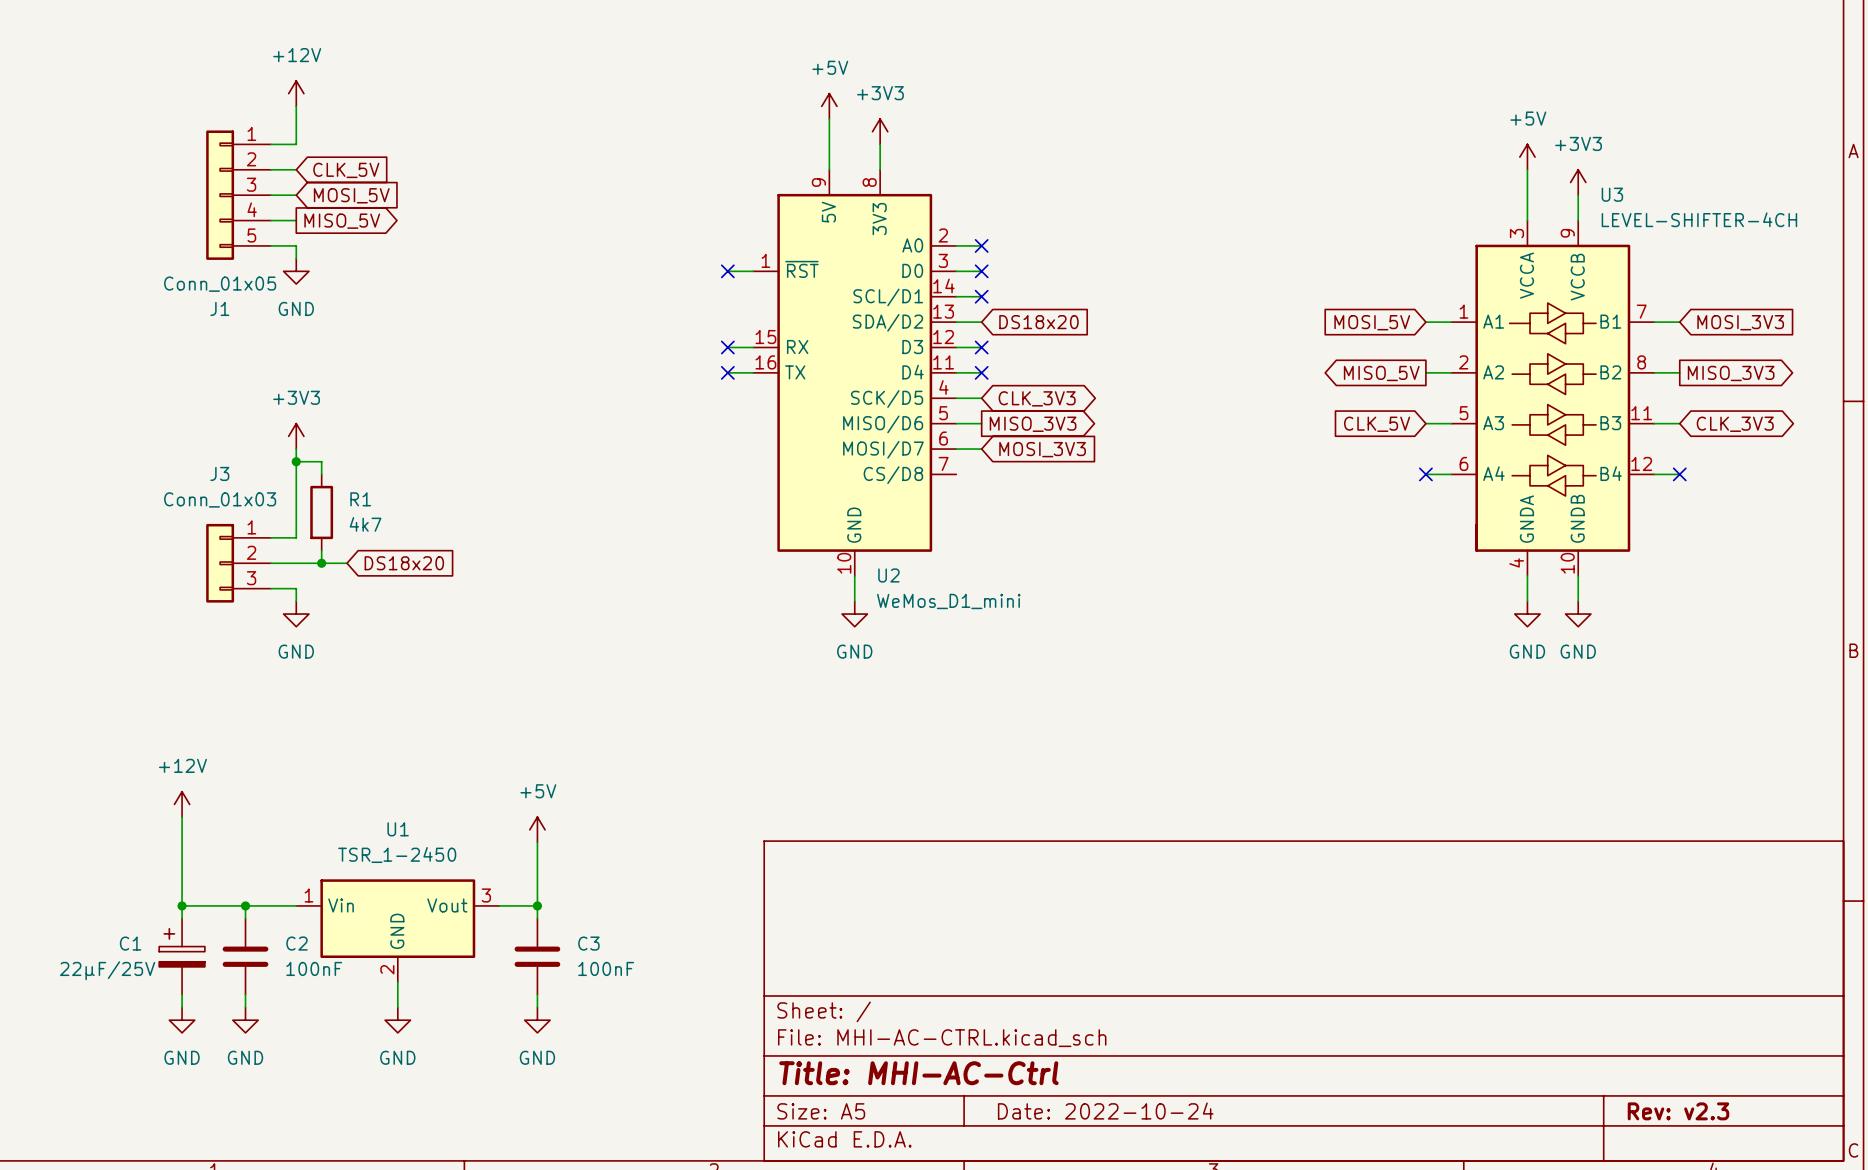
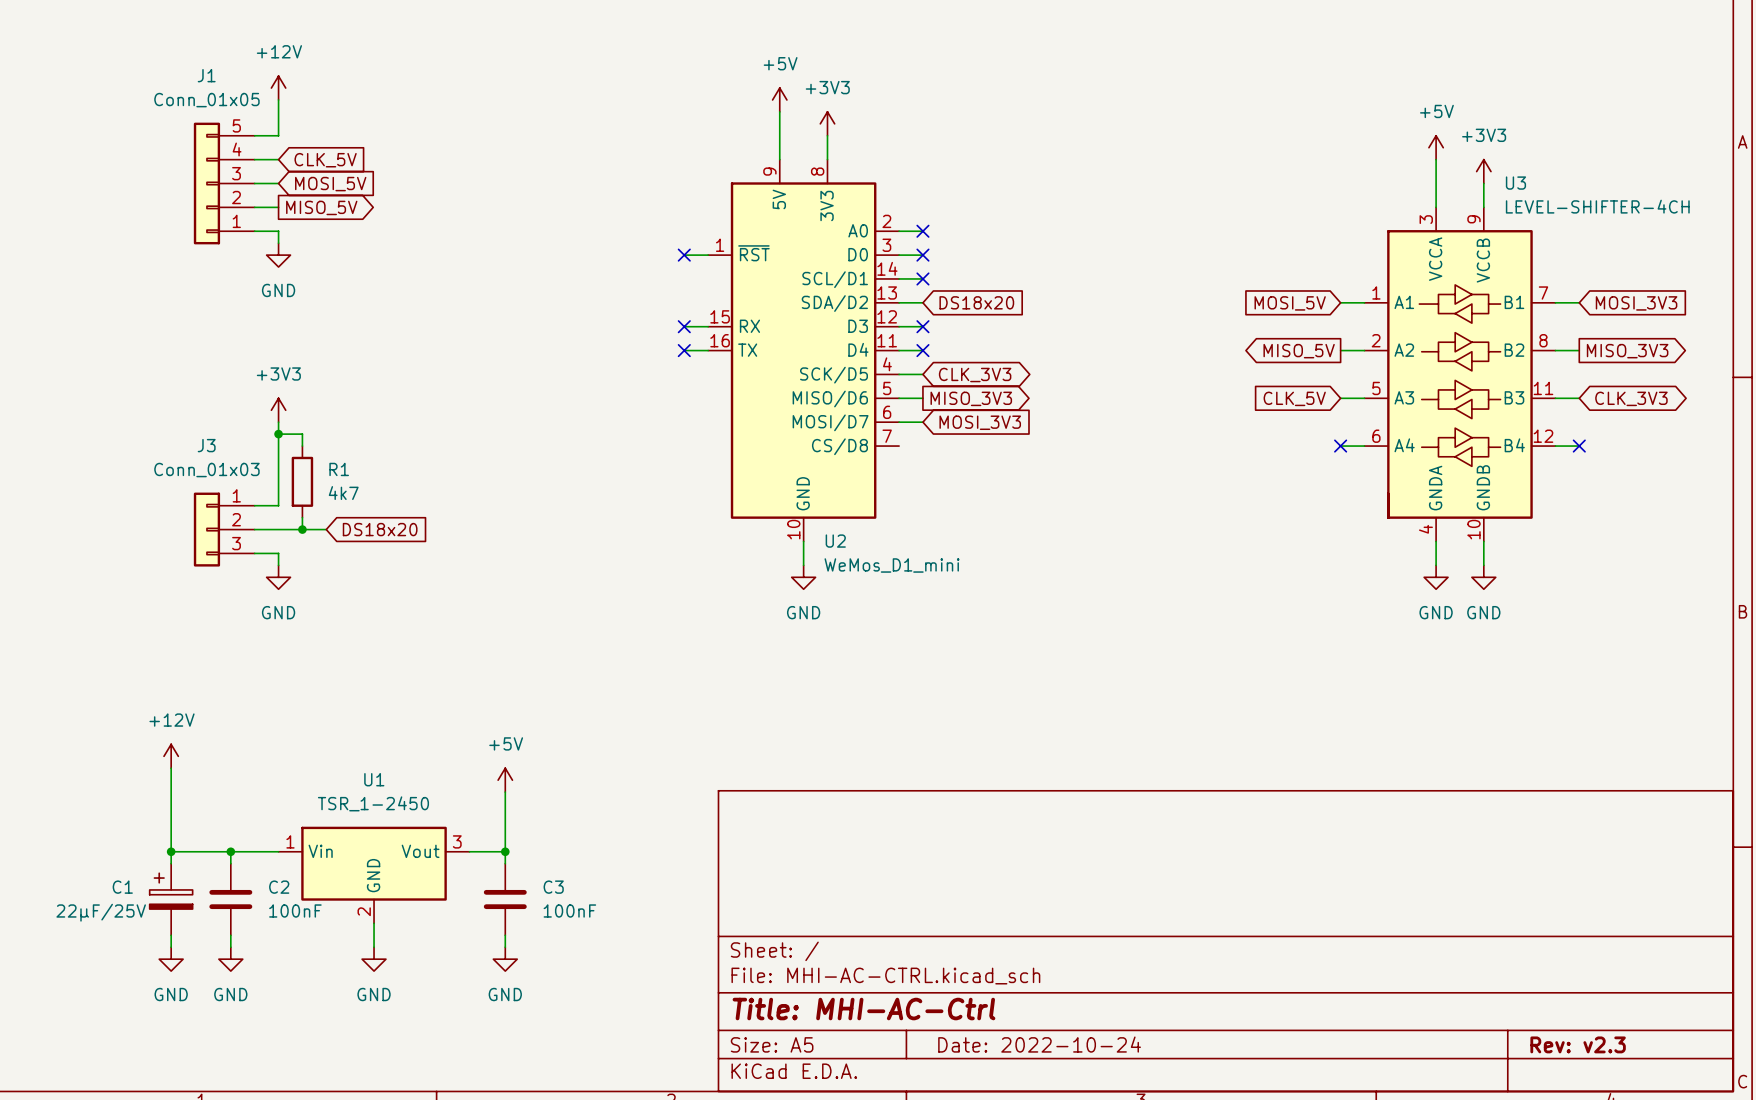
J1 flip: as is (220, 195) -> up-down (206, 183)

